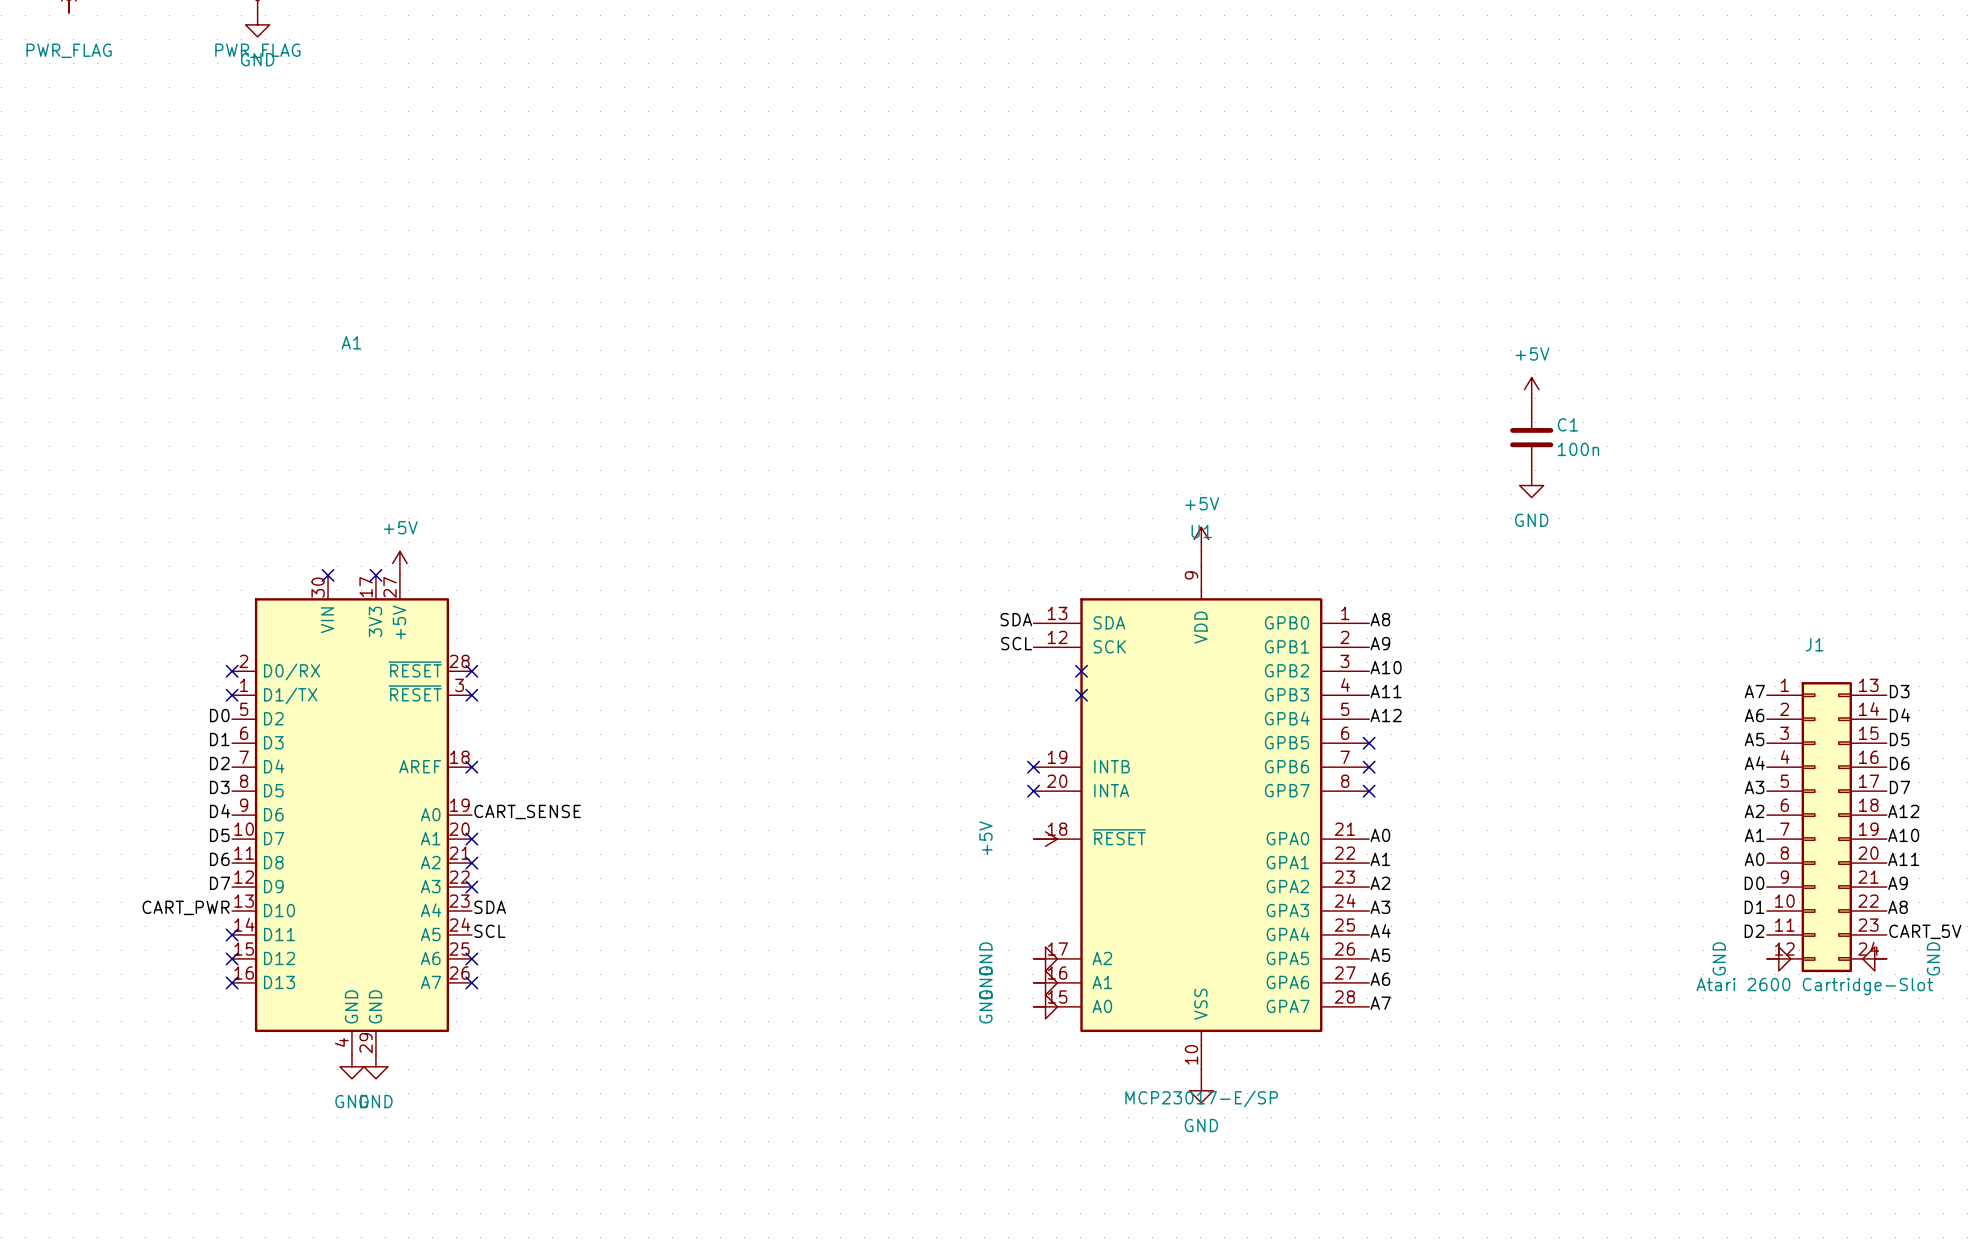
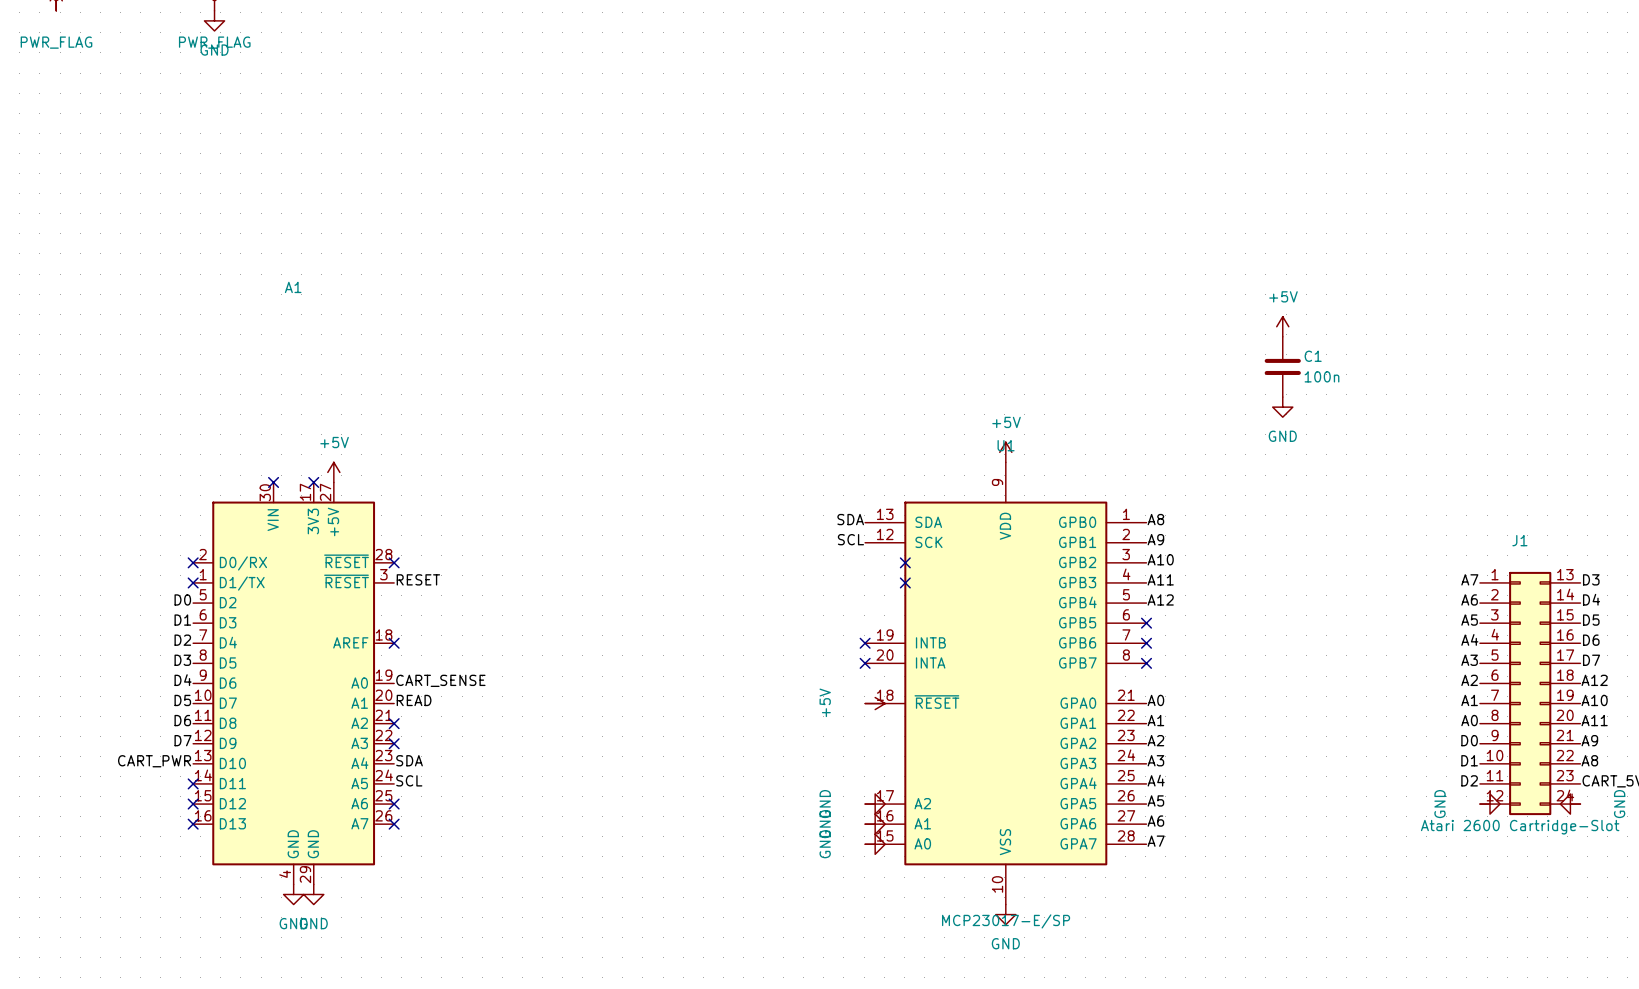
label: none -> RESET (418, 579)
no-connect mark: (471, 695) -> none
label: none -> READ (414, 700)
no-connect mark: (471, 839) -> none

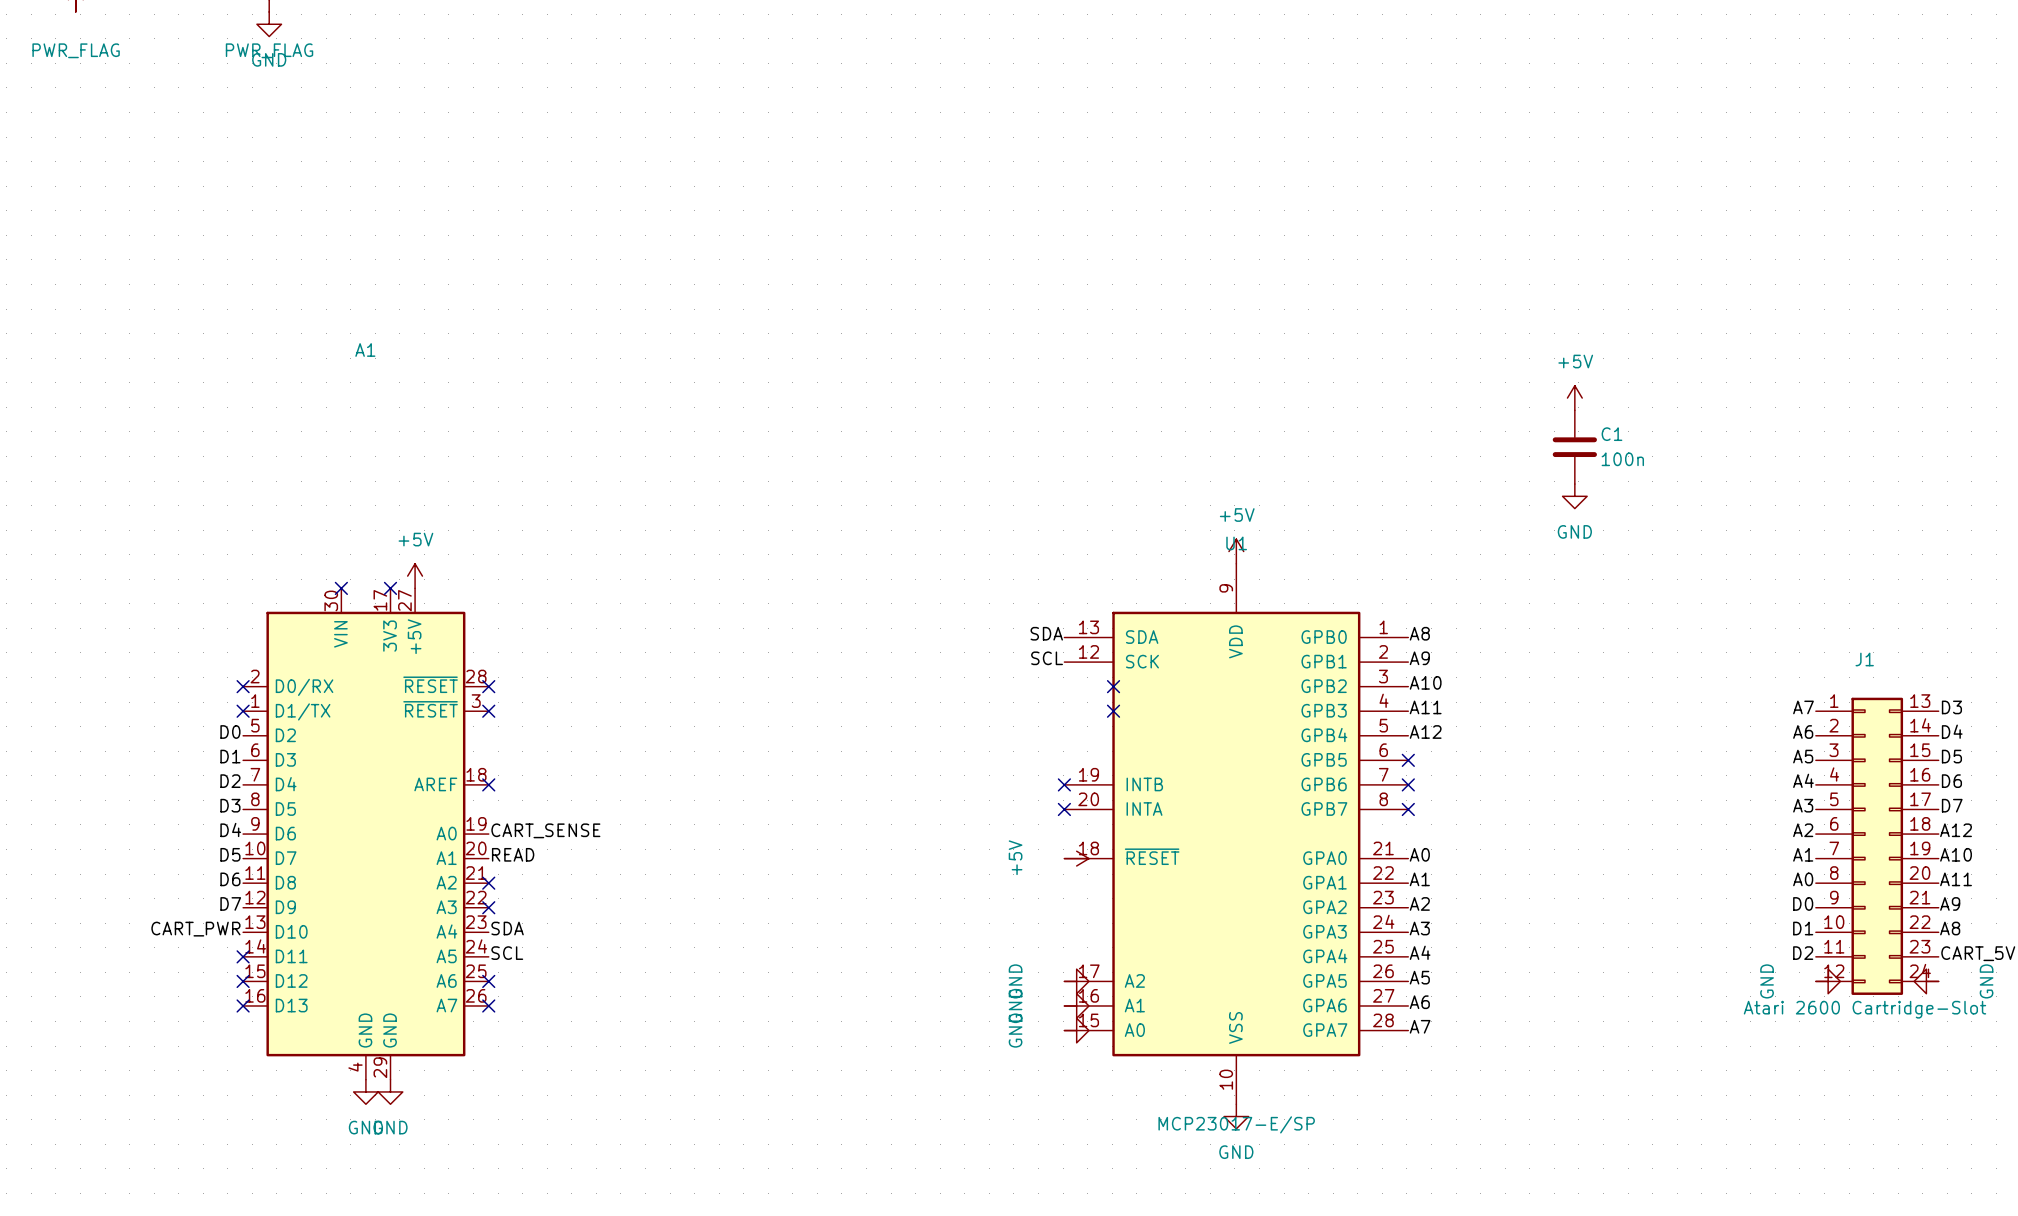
label: RESET (418, 579) -> none
no-connect mark: none -> (488, 711)

